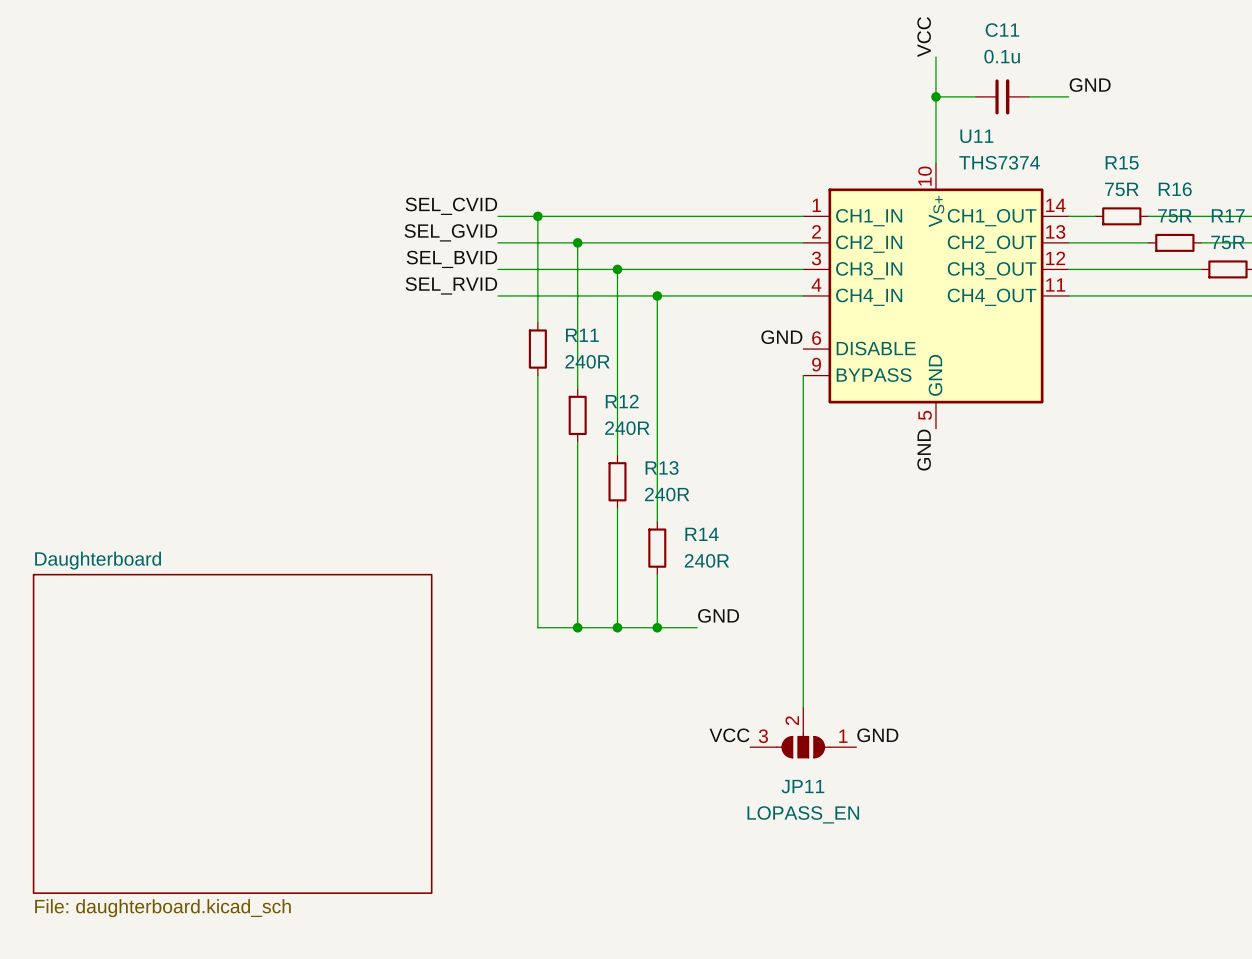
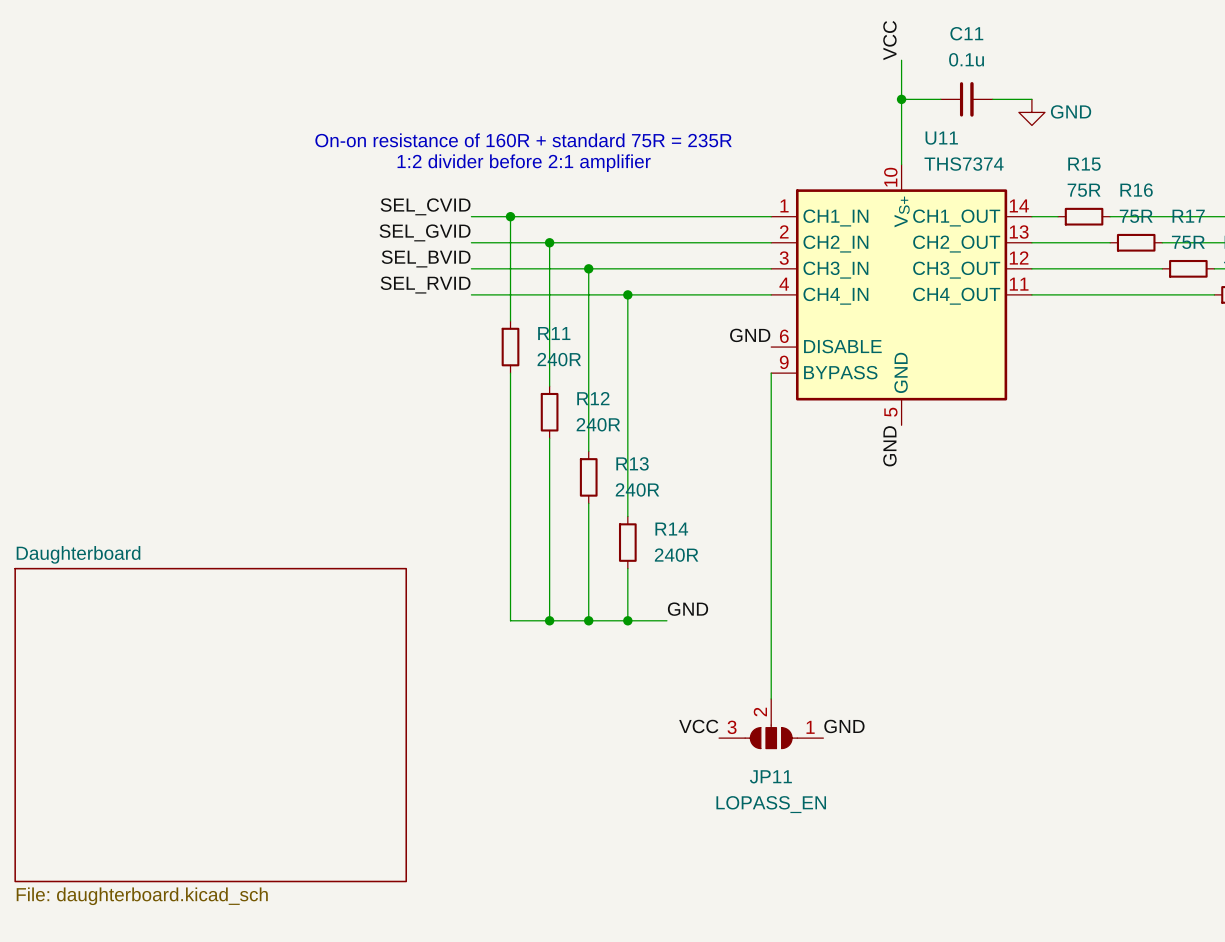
label: GND (1090, 85) -> none
power symbol: none -> GND (1031, 112)
text: none -> On-on resistance of 160R + standard 75R = 235R (523, 140)
text: none -> 1:2 divider before 2:1 amplifier (524, 163)

